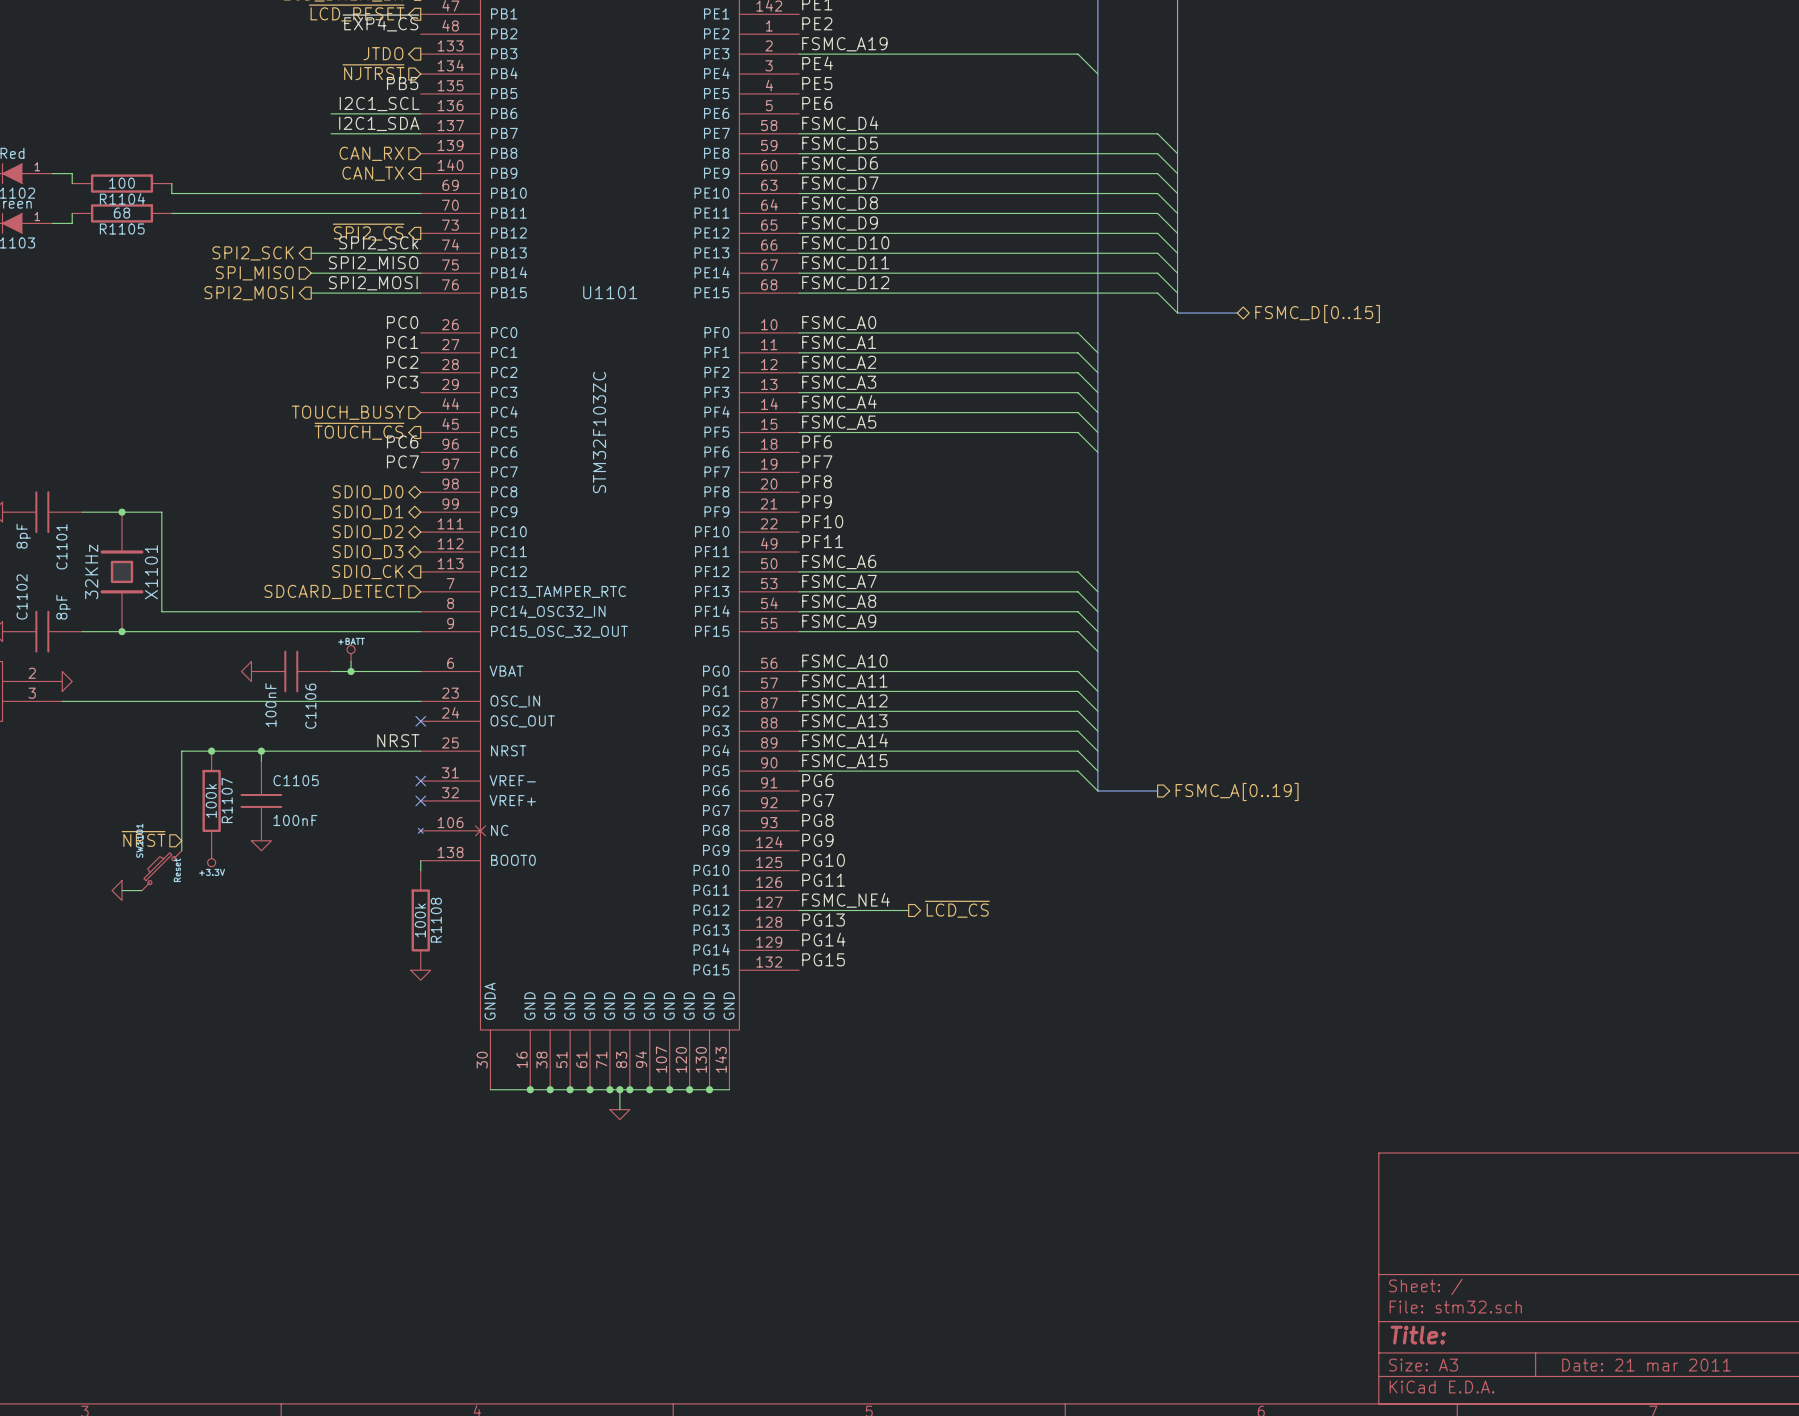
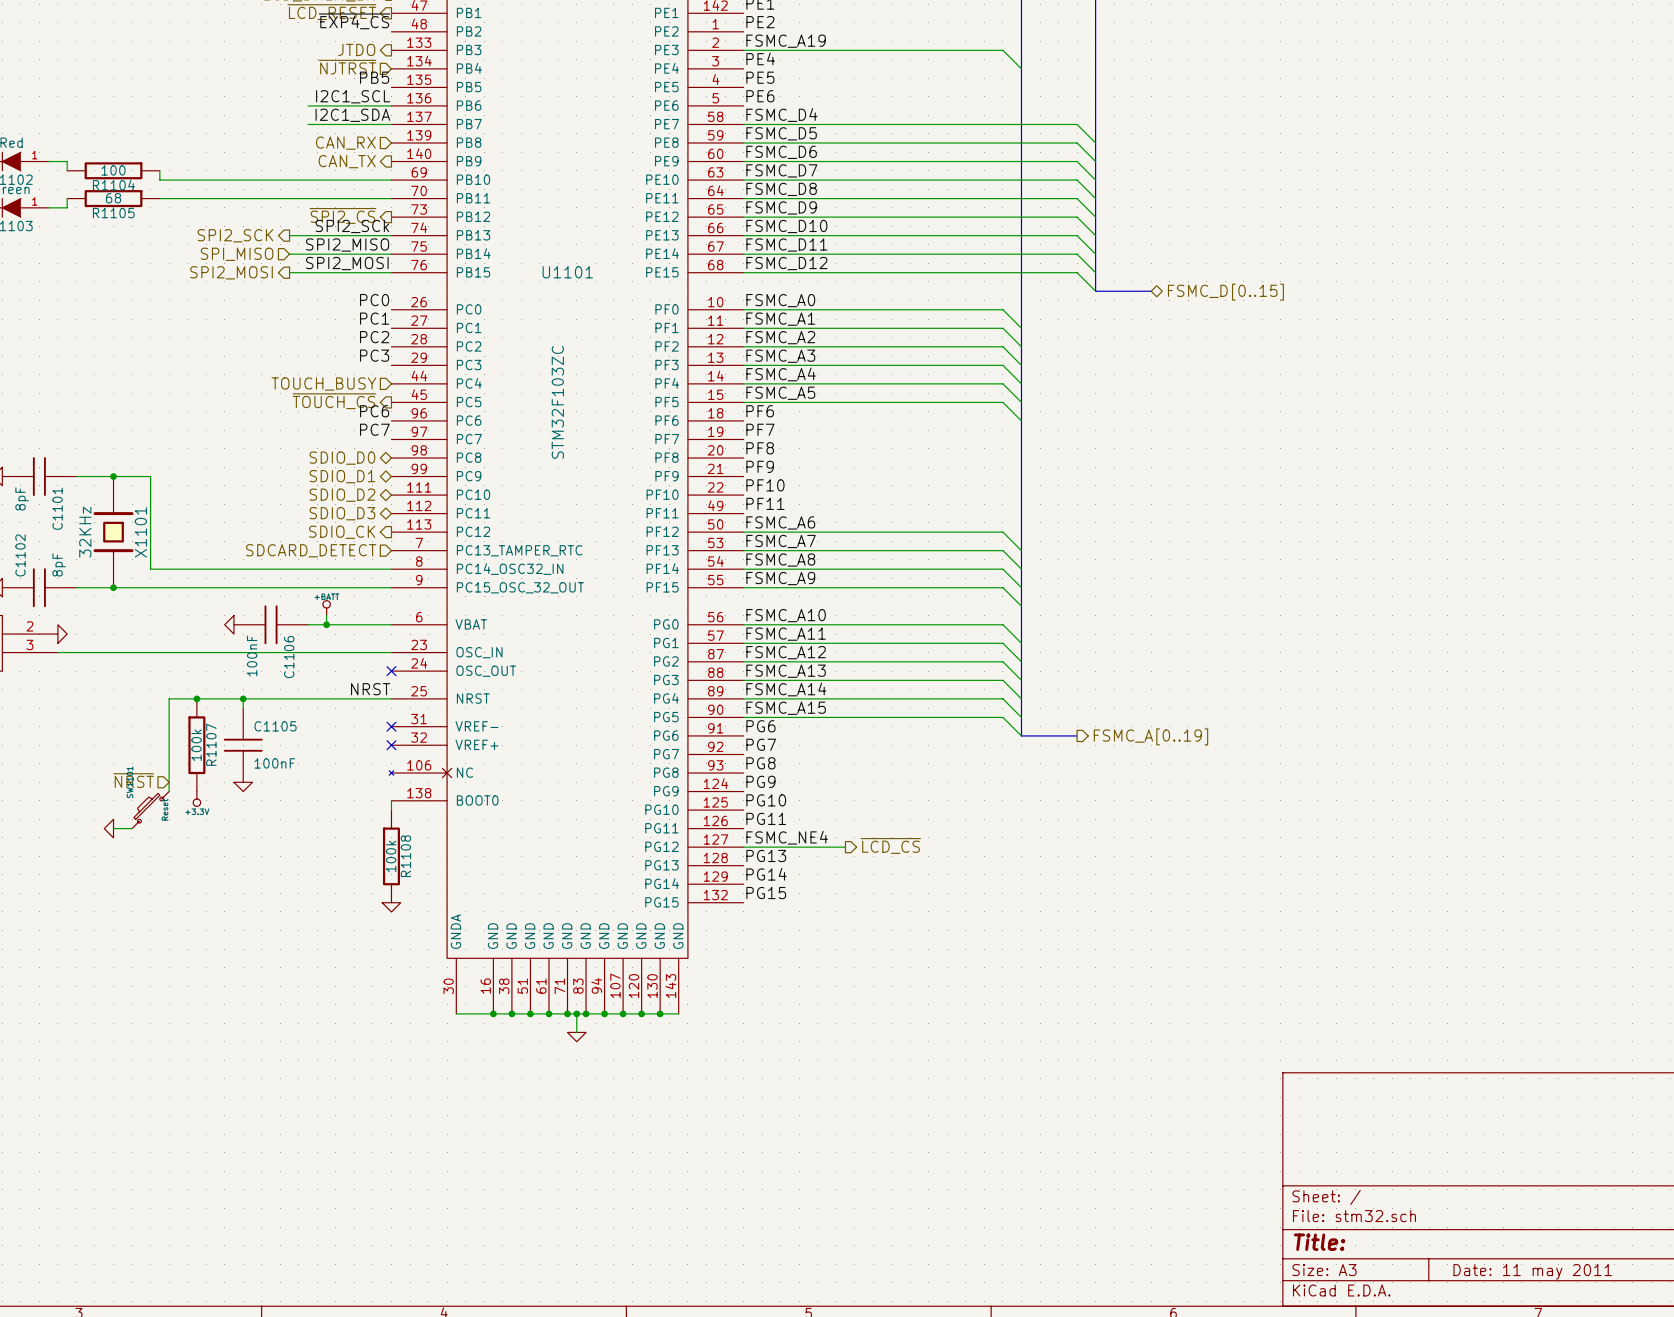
title block: Date: 21 mar 2011 (1646, 1365) -> Date: 11 may 2011 (1532, 1271)

